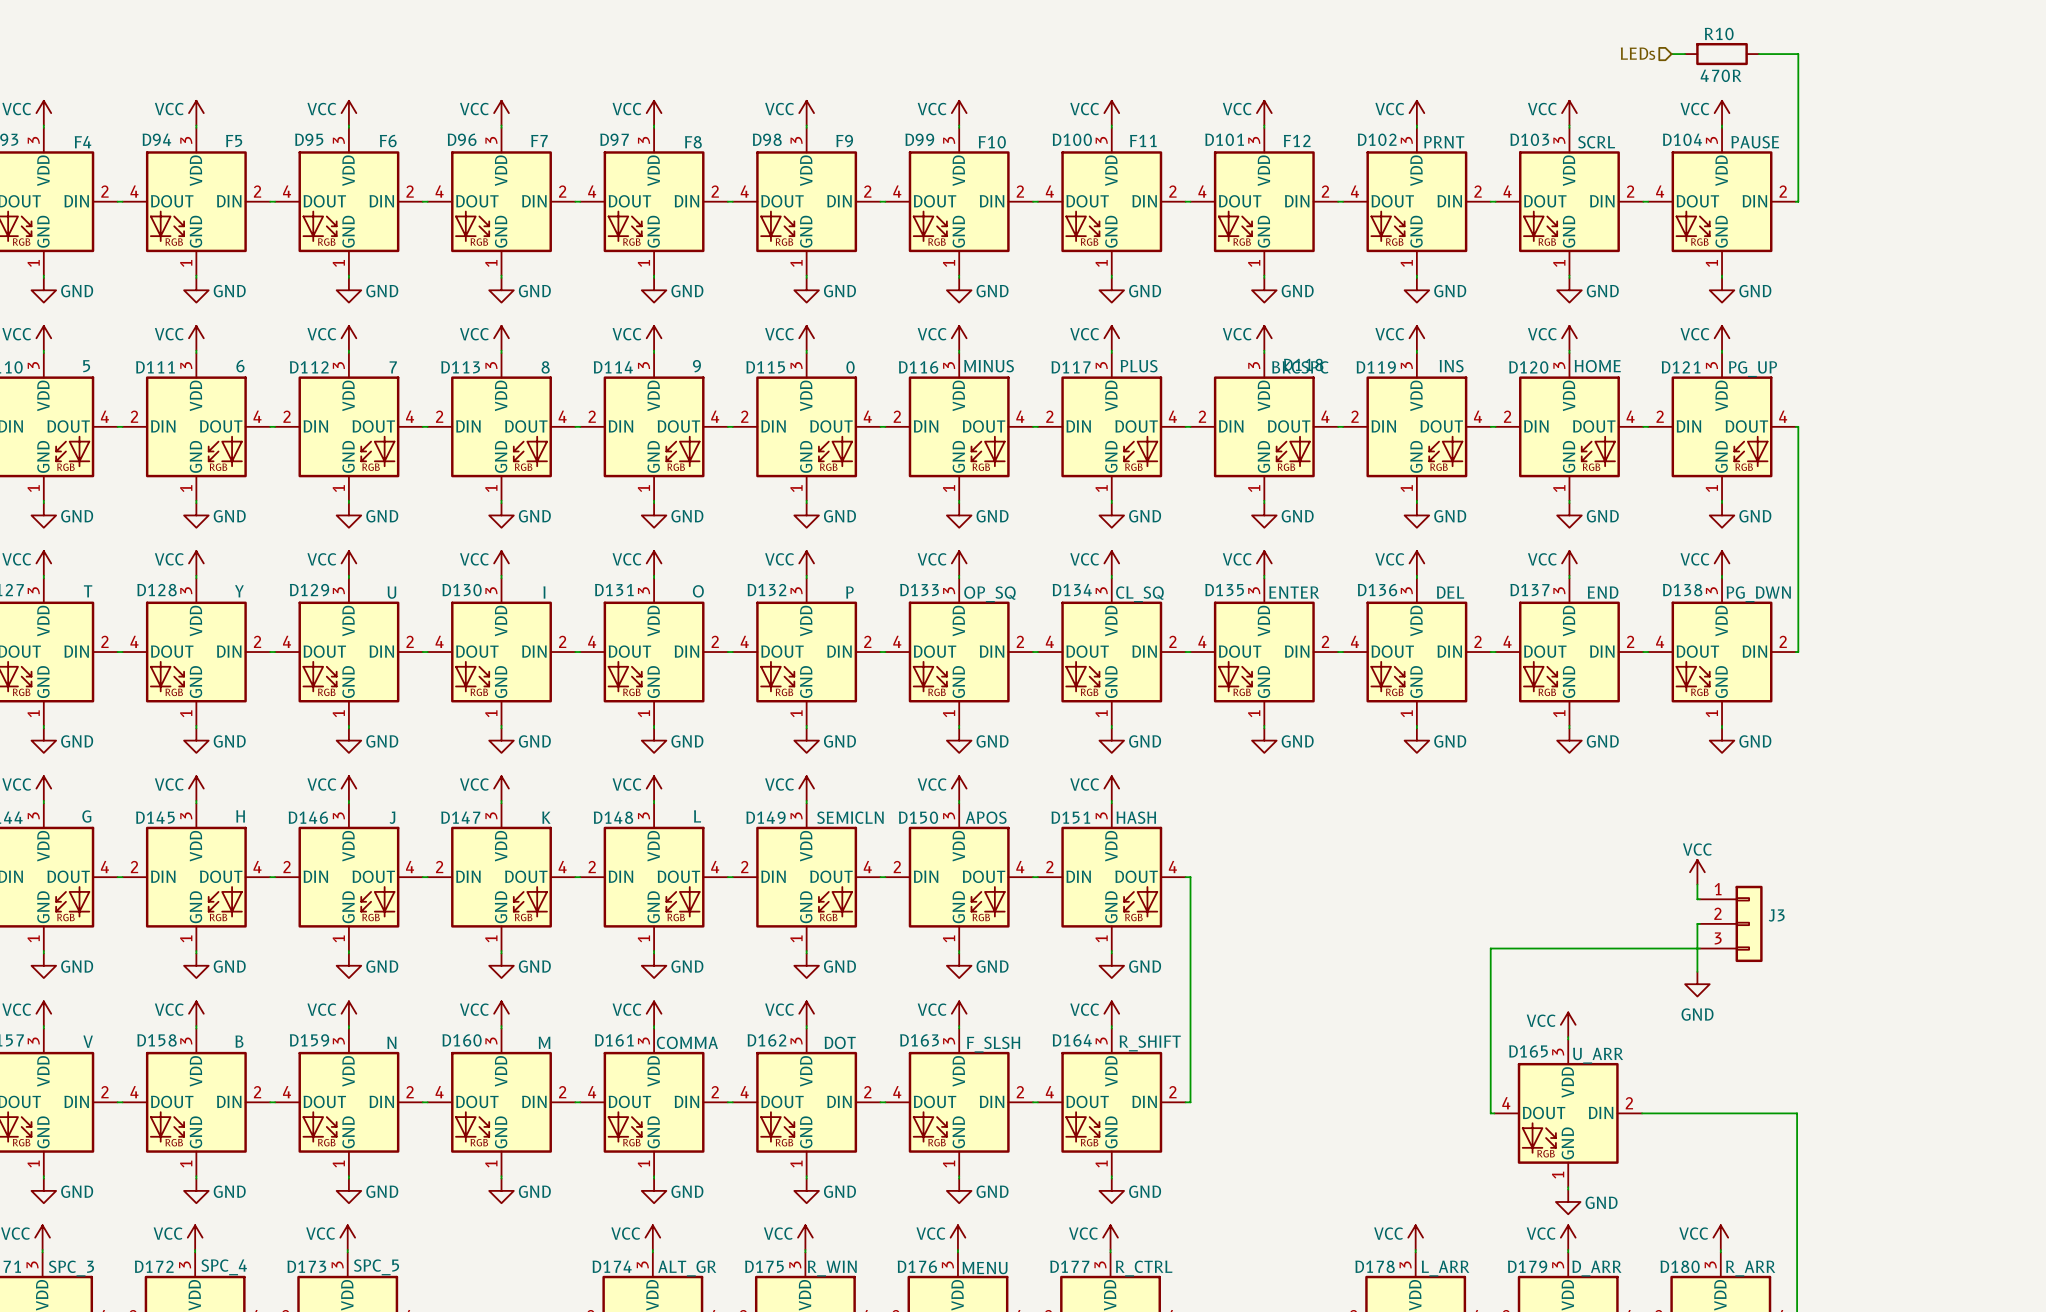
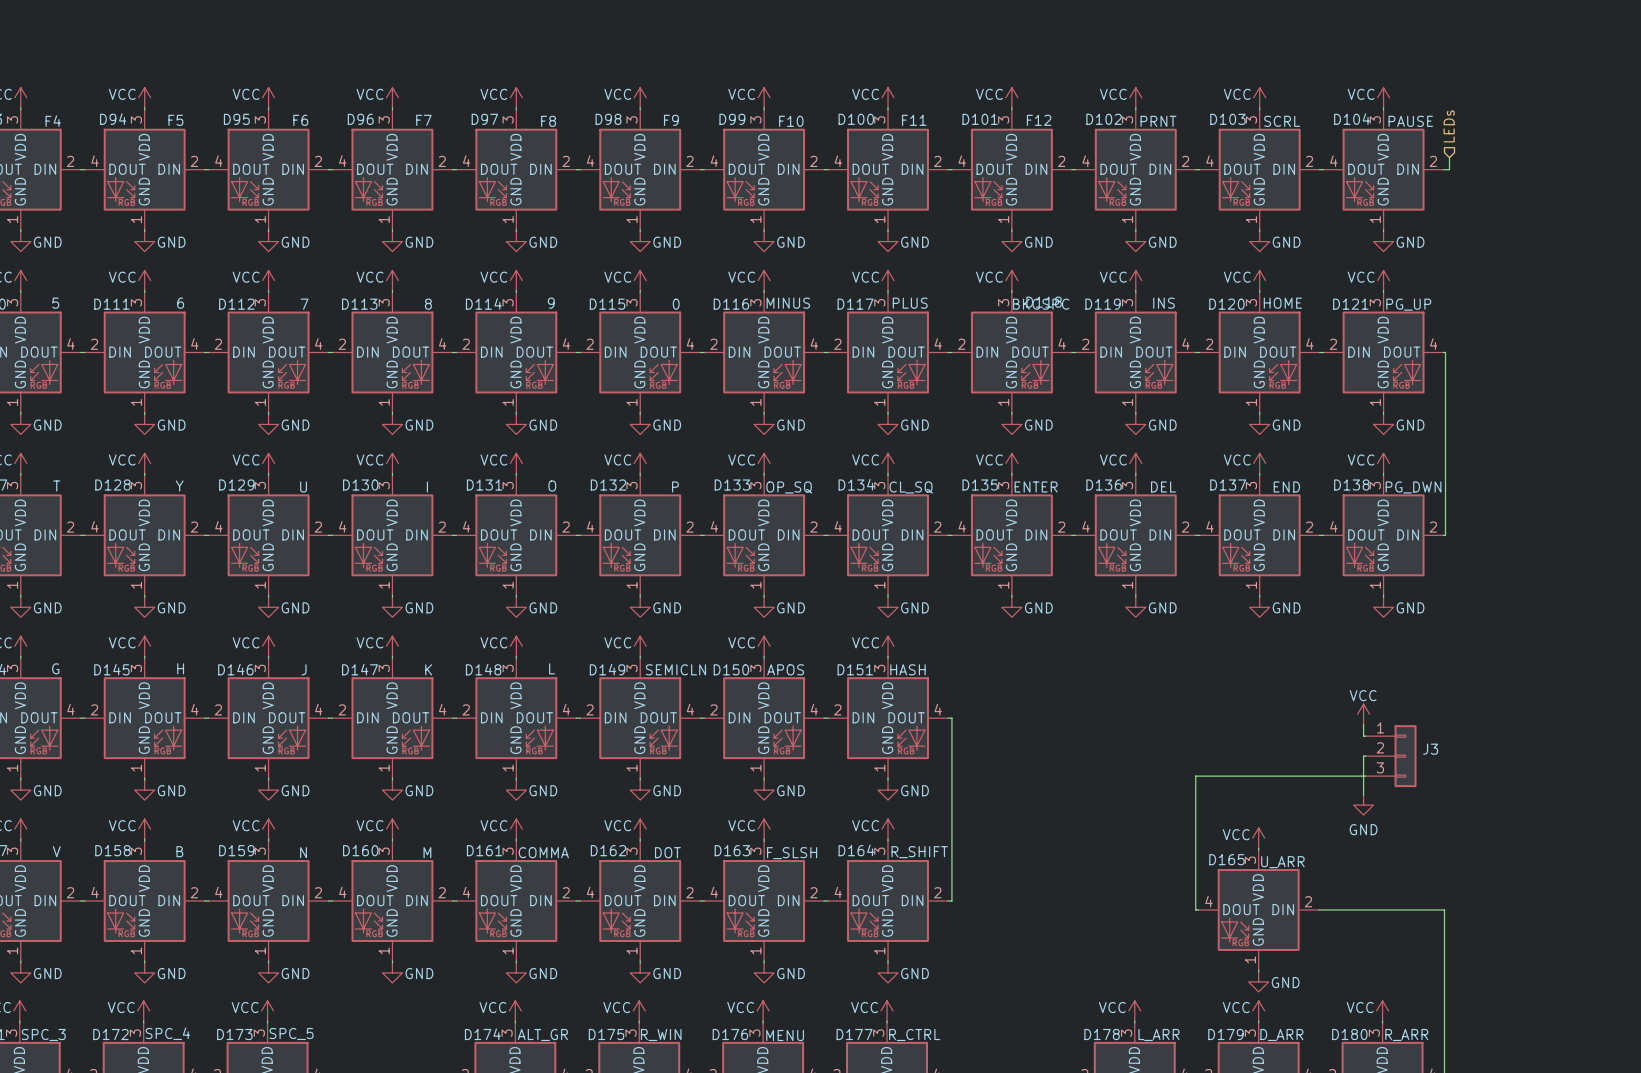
hierarchical label rotation: 0° (1638, 53) -> 90° clockwise (1449, 126)
hierarchical label position: LEDs (1638, 53) -> LEDs (1449, 126)
wire: (1671, 54) (1685, 54) -> none
R10: 470R (1722, 54) -> none
wire: (1758, 54) (1798, 54) (1798, 201) -> (1449, 157) (1449, 169) (1445, 169)

